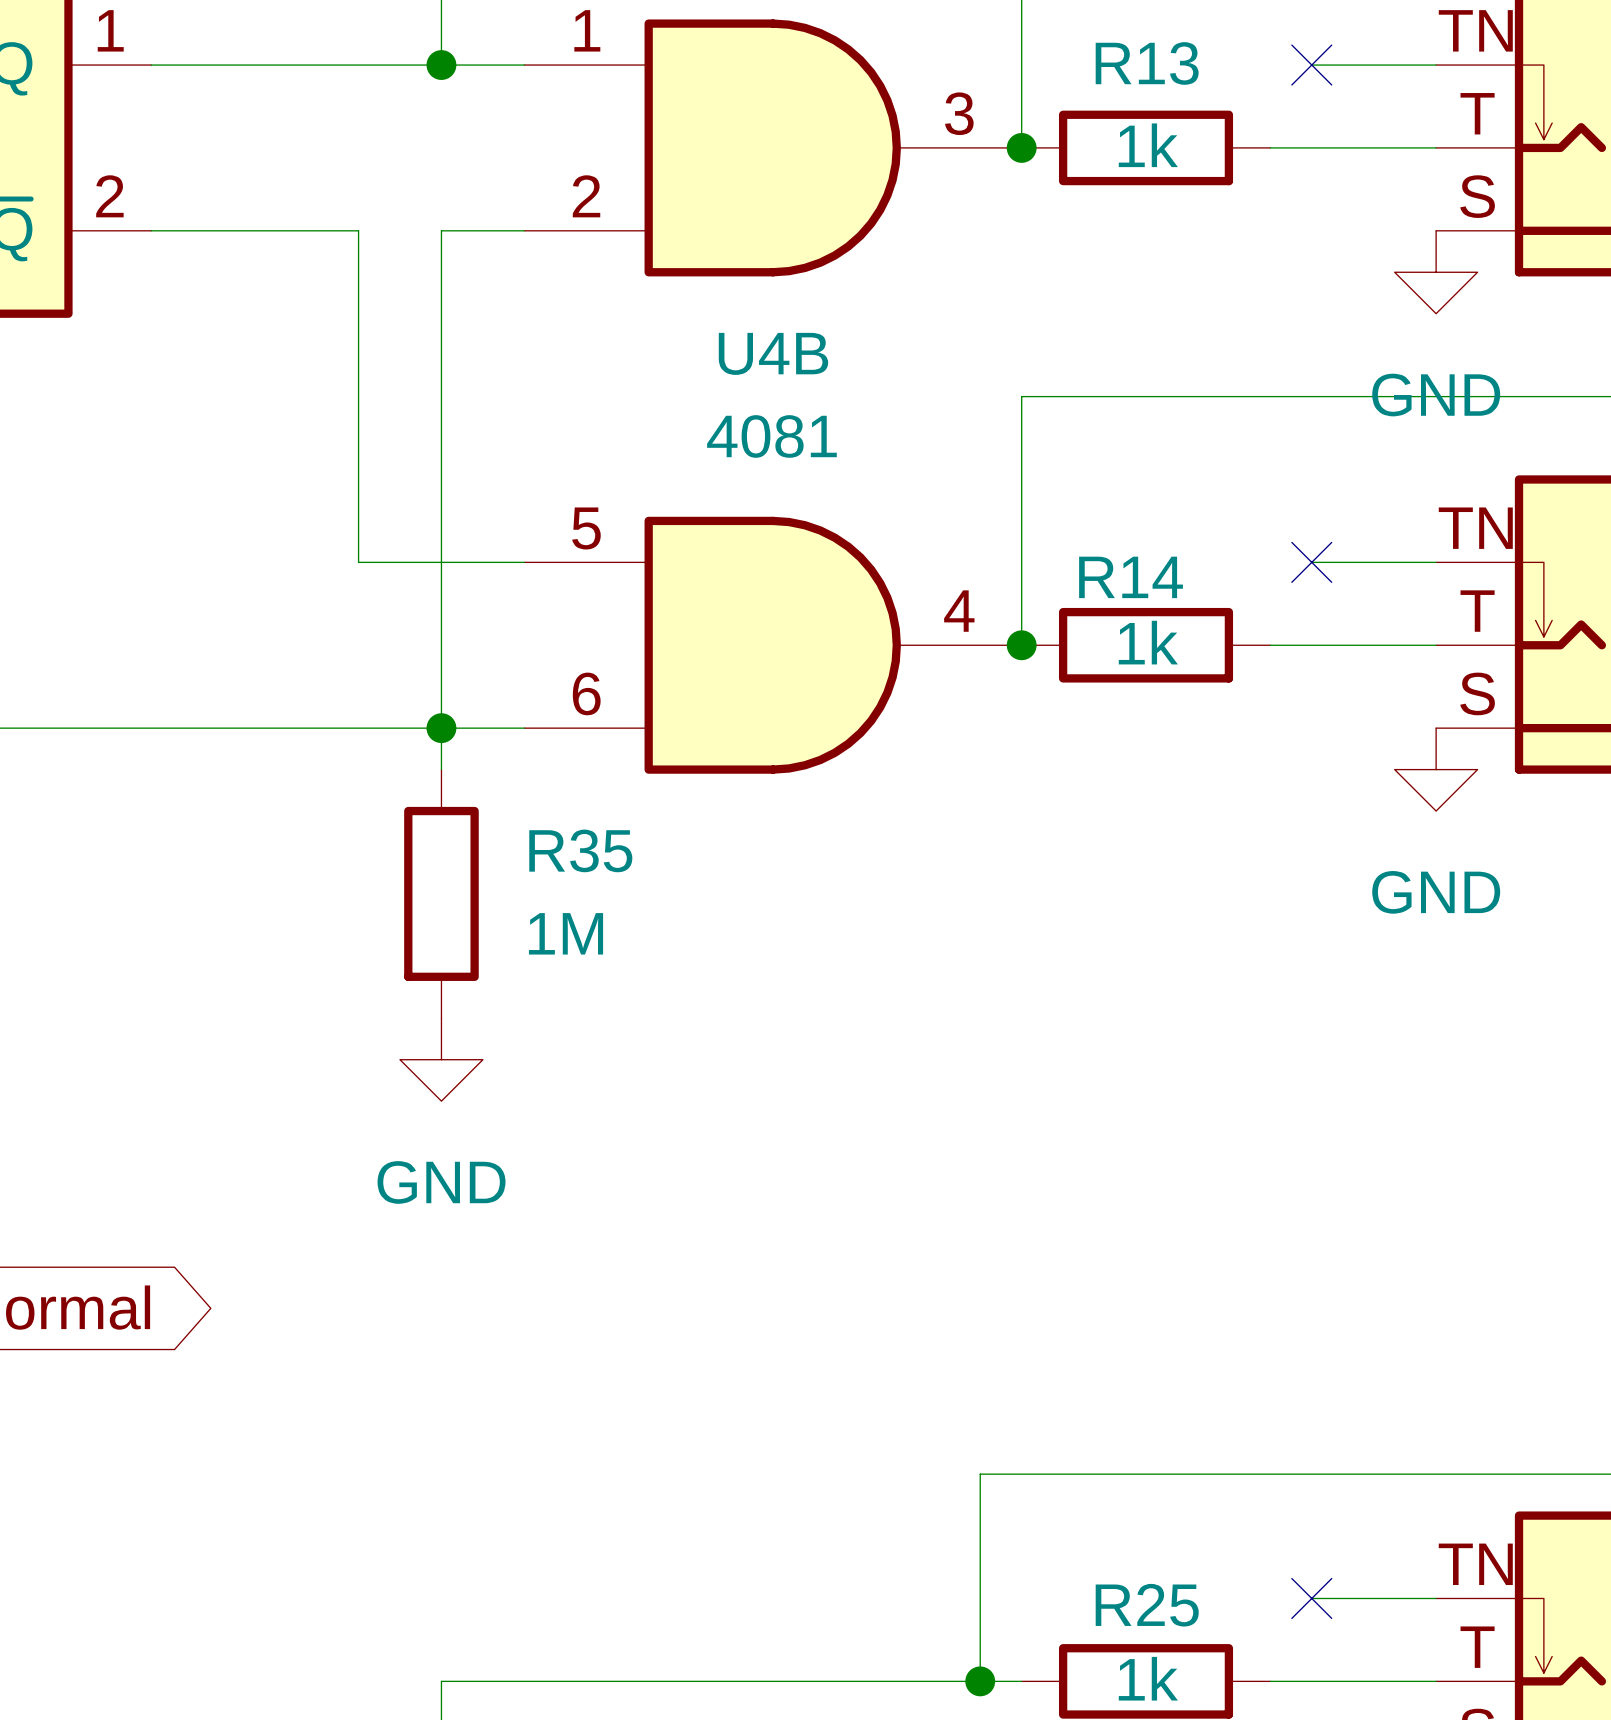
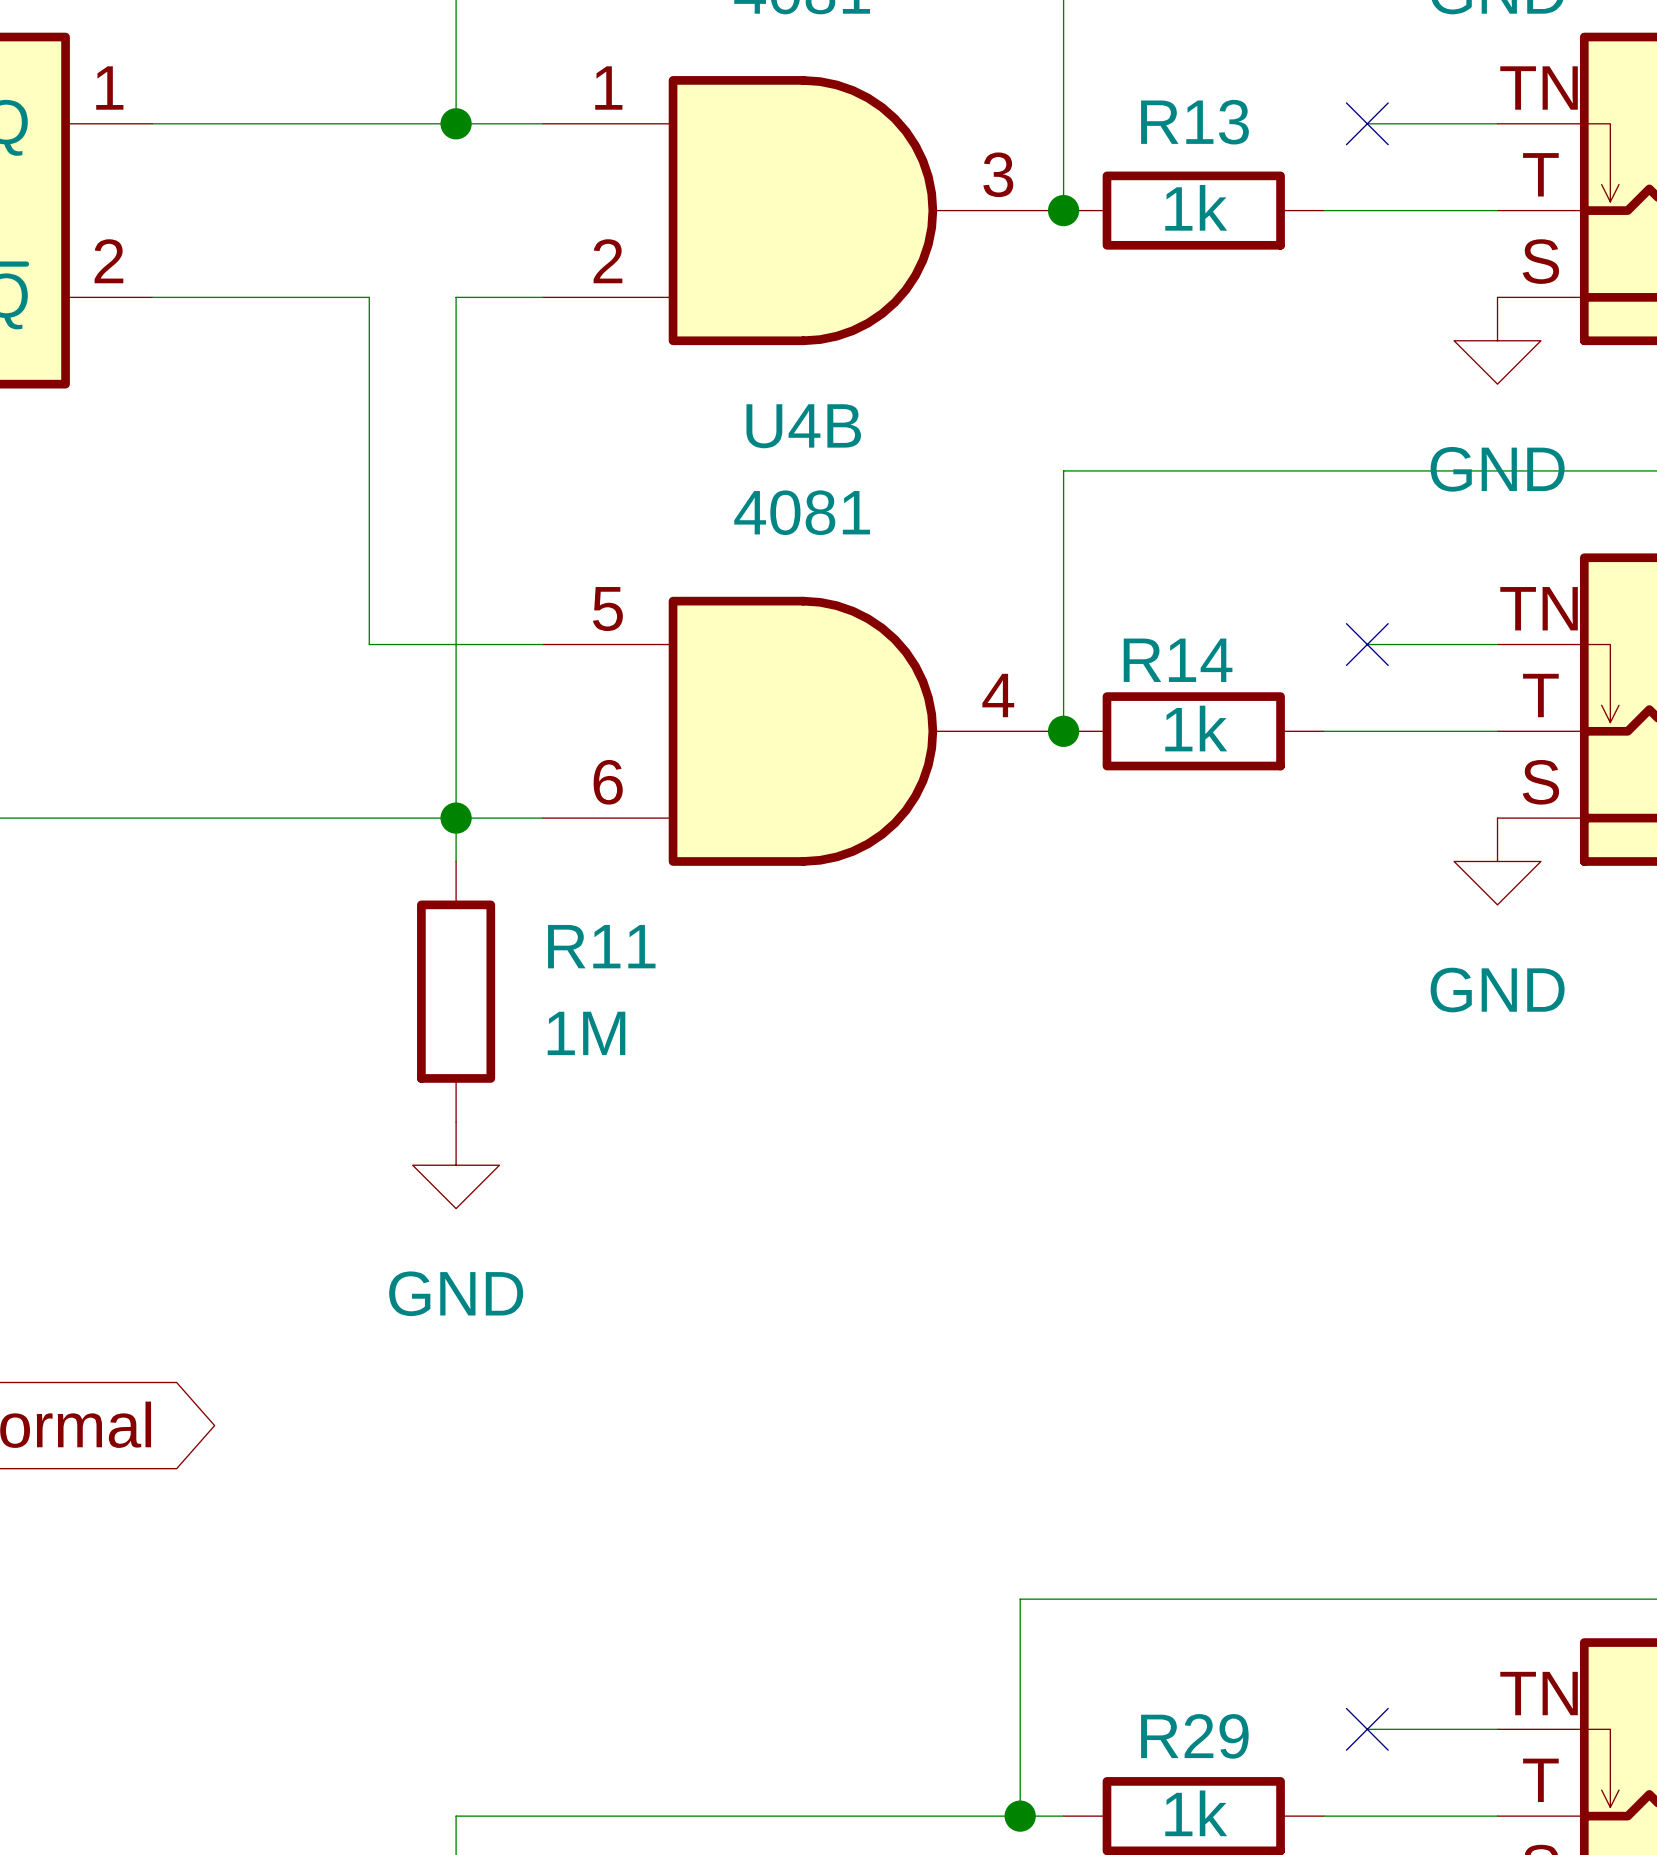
R35 name: R35 (580, 850) -> R11 (601, 946)
R25 name: R25 (1147, 1605) -> R29 (1194, 1736)

